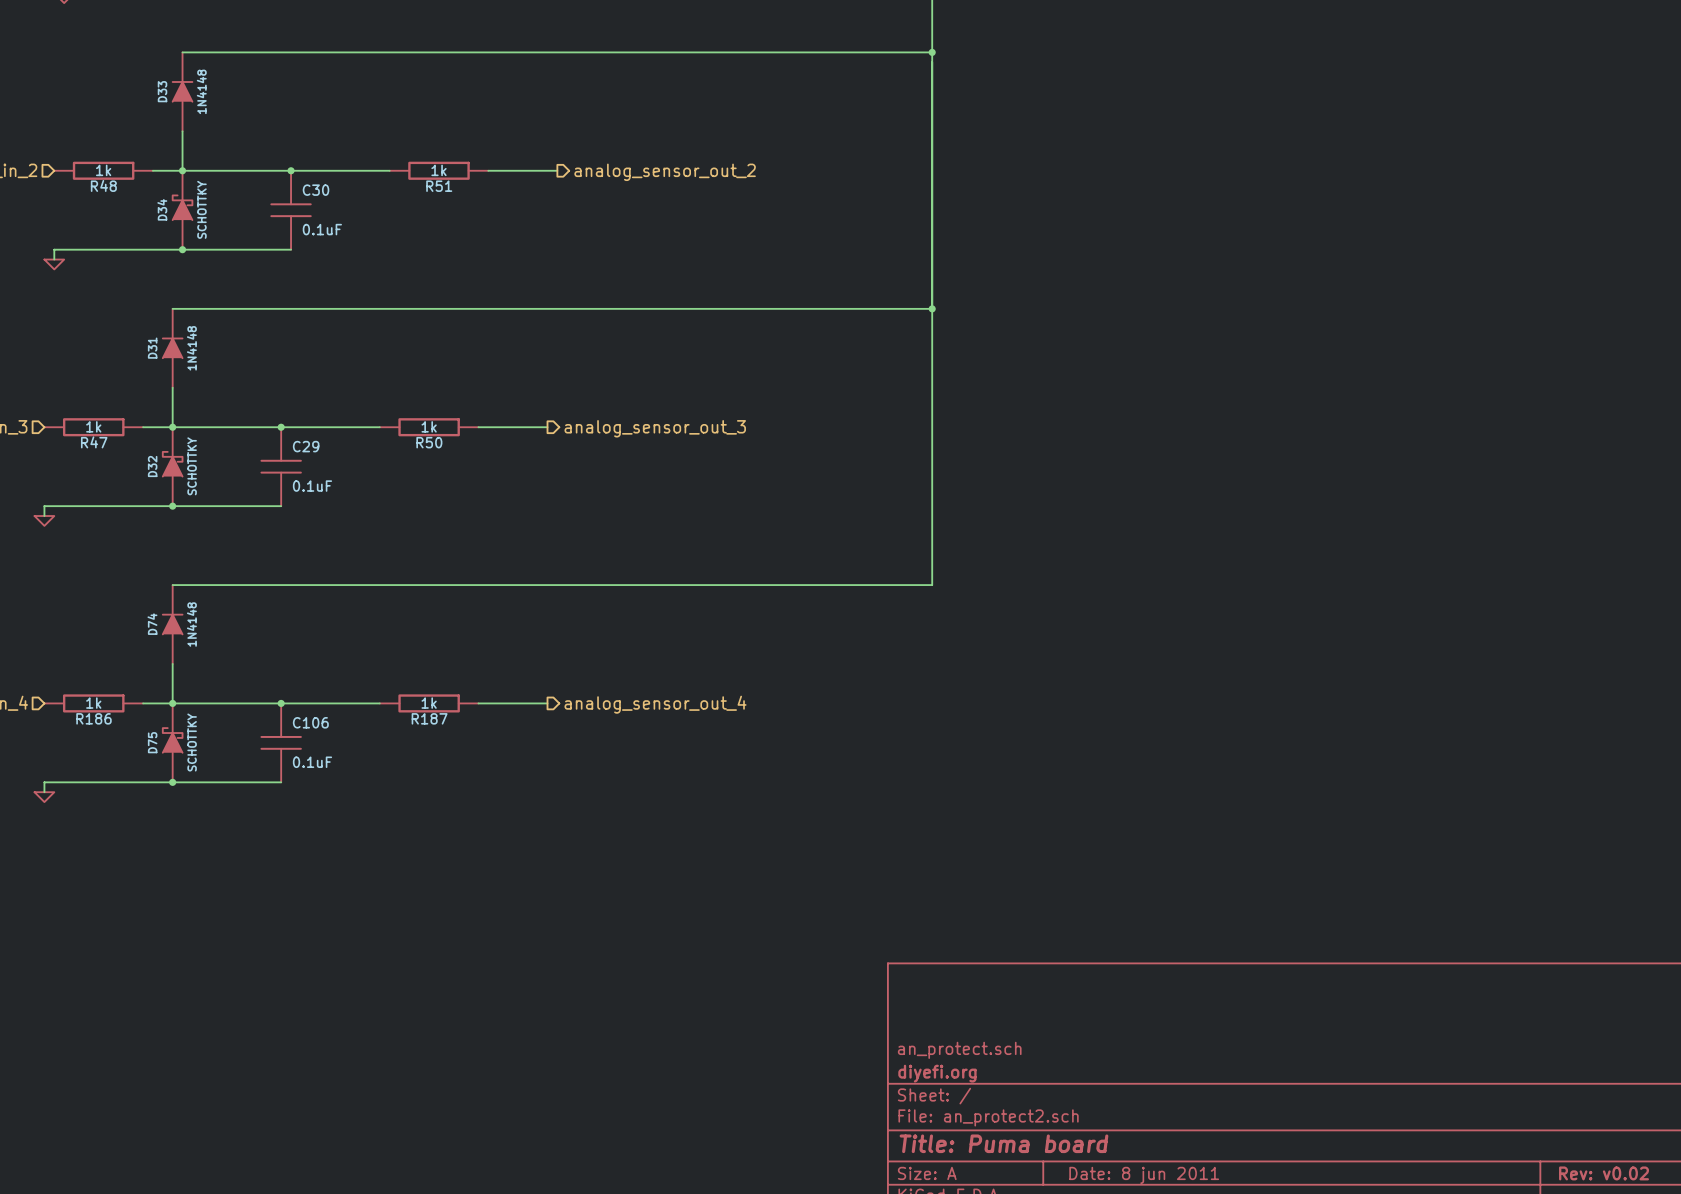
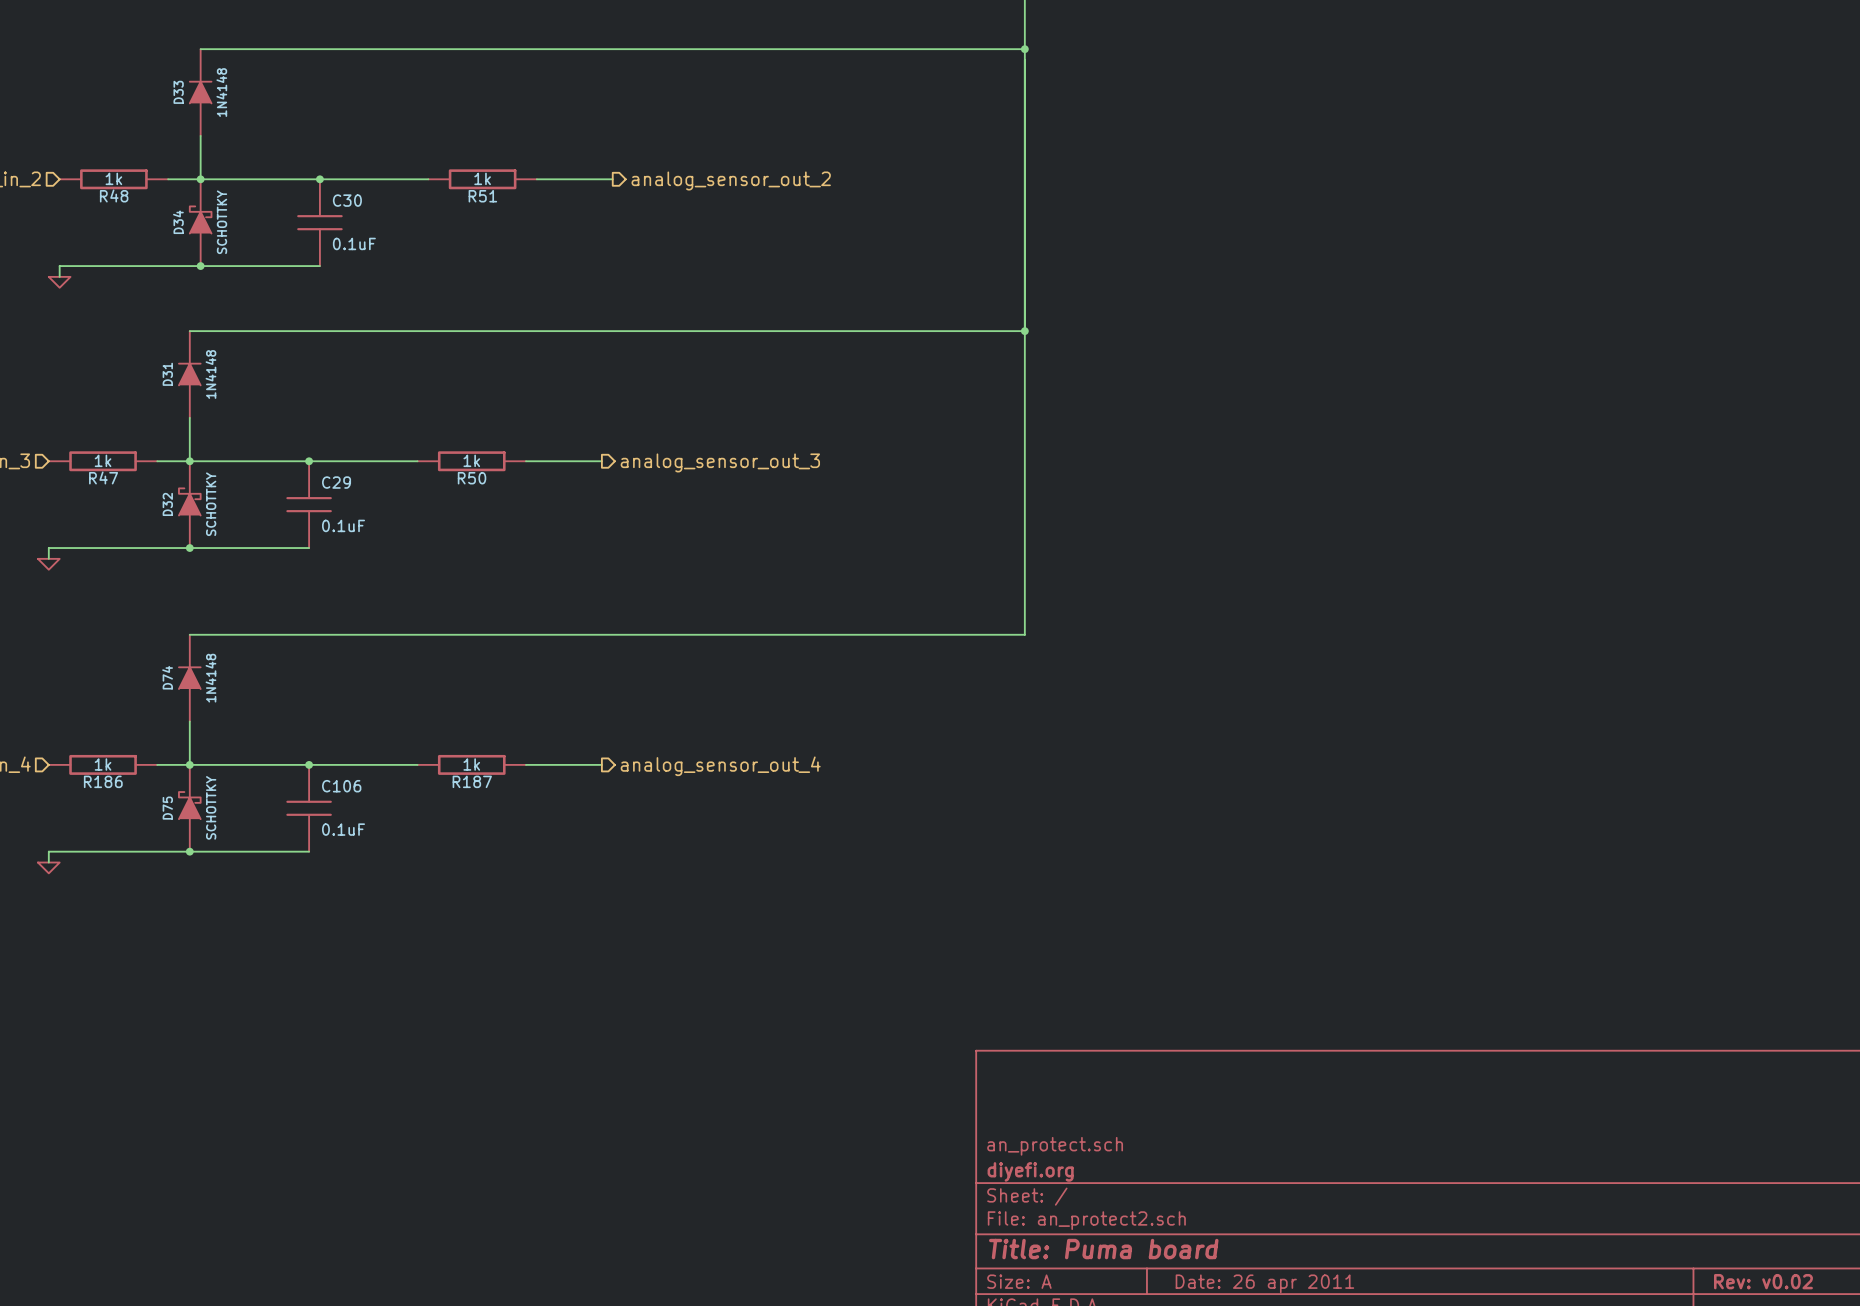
title block: Date: 8 jun 2011 (1144, 1175) -> Date: 26 apr 2011 (1264, 1283)

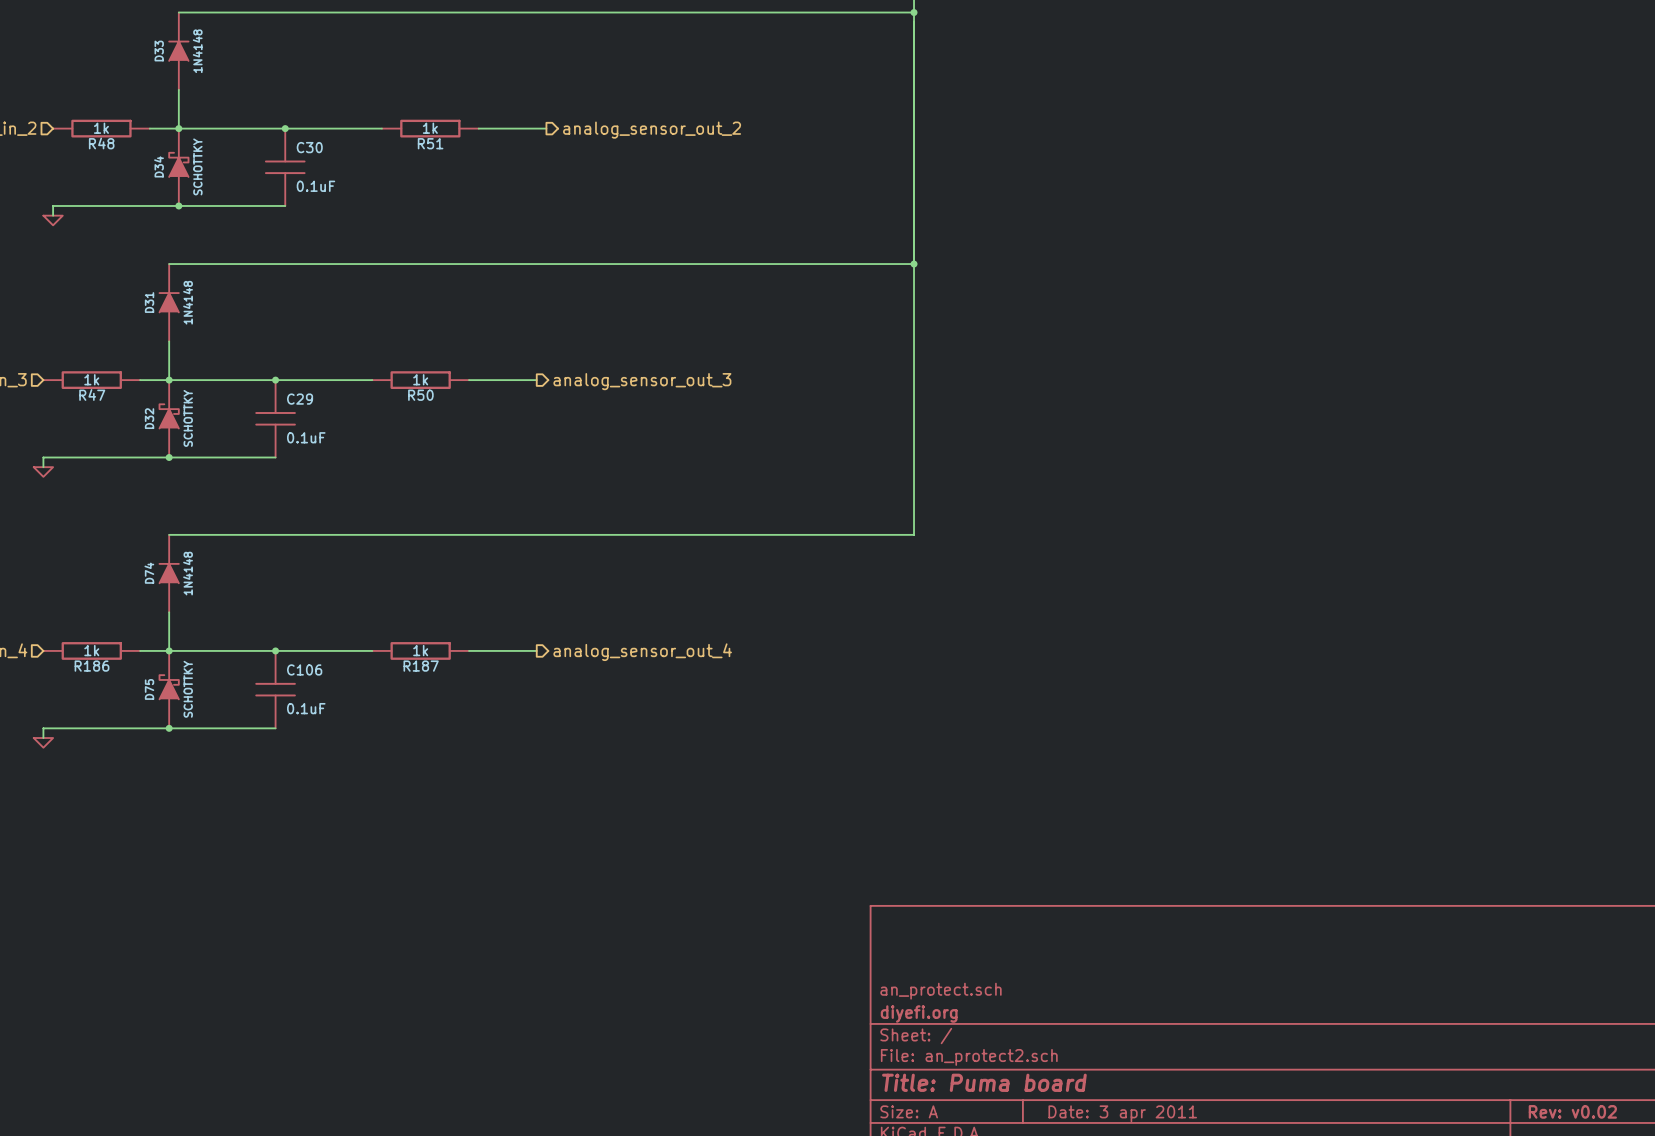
title block: Date: 26 apr 2011 (1264, 1283) -> Date: 3 apr 2011 (1122, 1113)

